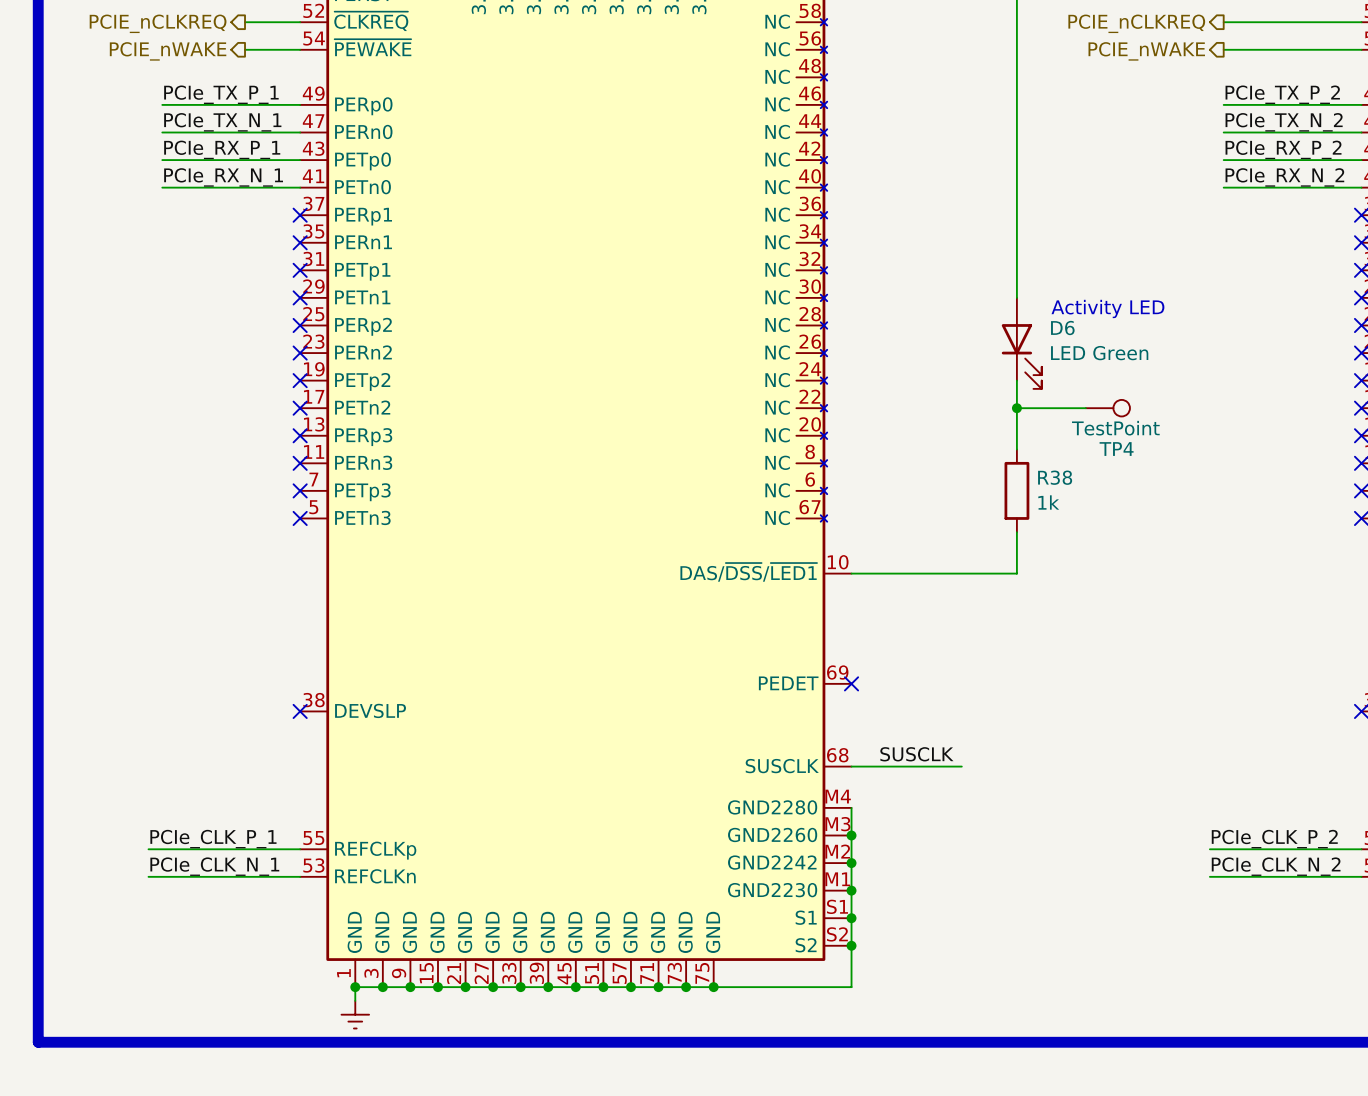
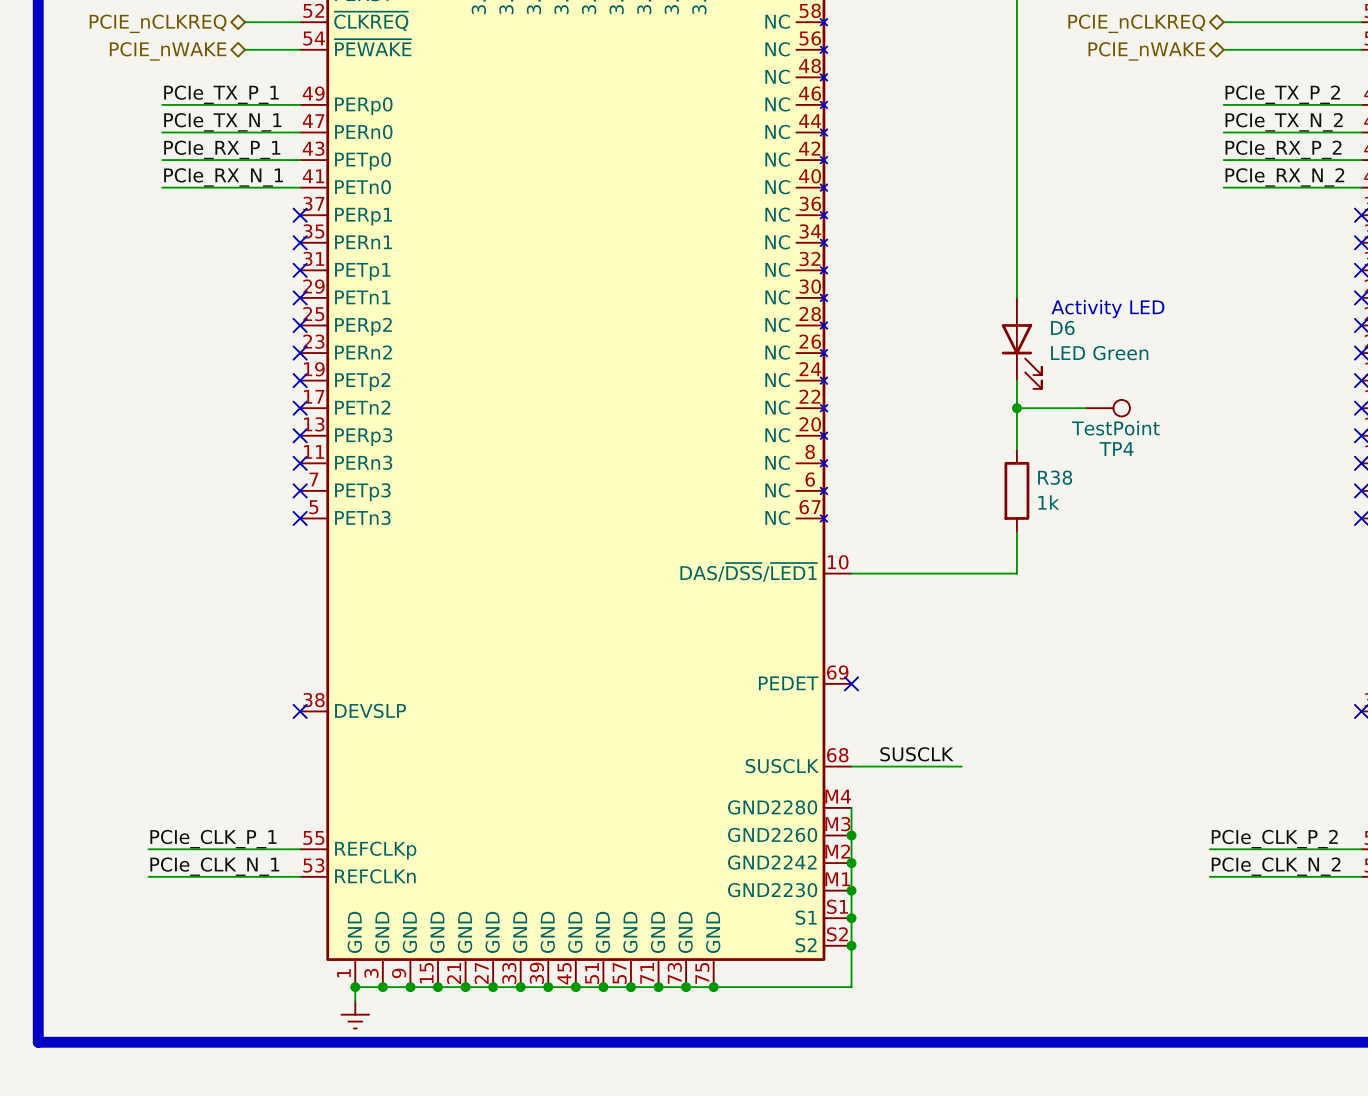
hierarchical label shape: output (158, 23) -> bidirectional (158, 23)
hierarchical label shape: output (1136, 23) -> bidirectional (1136, 23)
hierarchical label shape: output (168, 51) -> bidirectional (168, 51)
hierarchical label shape: output (1146, 51) -> bidirectional (1146, 51)

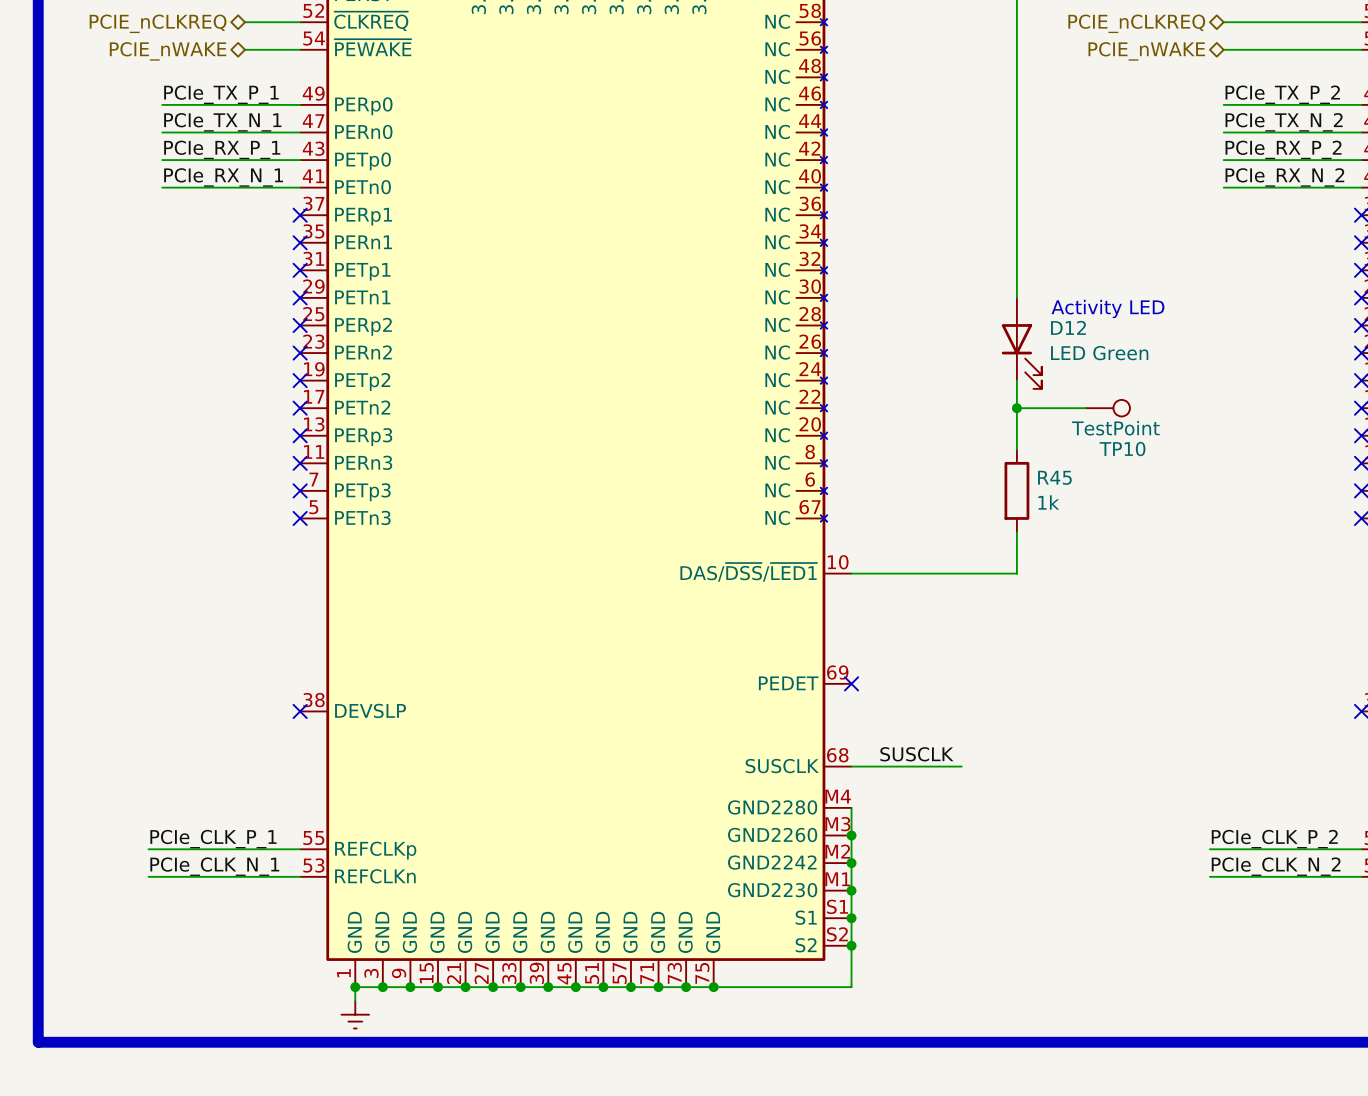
D6 name: D6 (1062, 328) -> D12 (1068, 327)
TP4 name: TP4 (1116, 449) -> TP10 (1122, 449)
R38 name: R38 (1055, 477) -> R45 (1054, 477)

